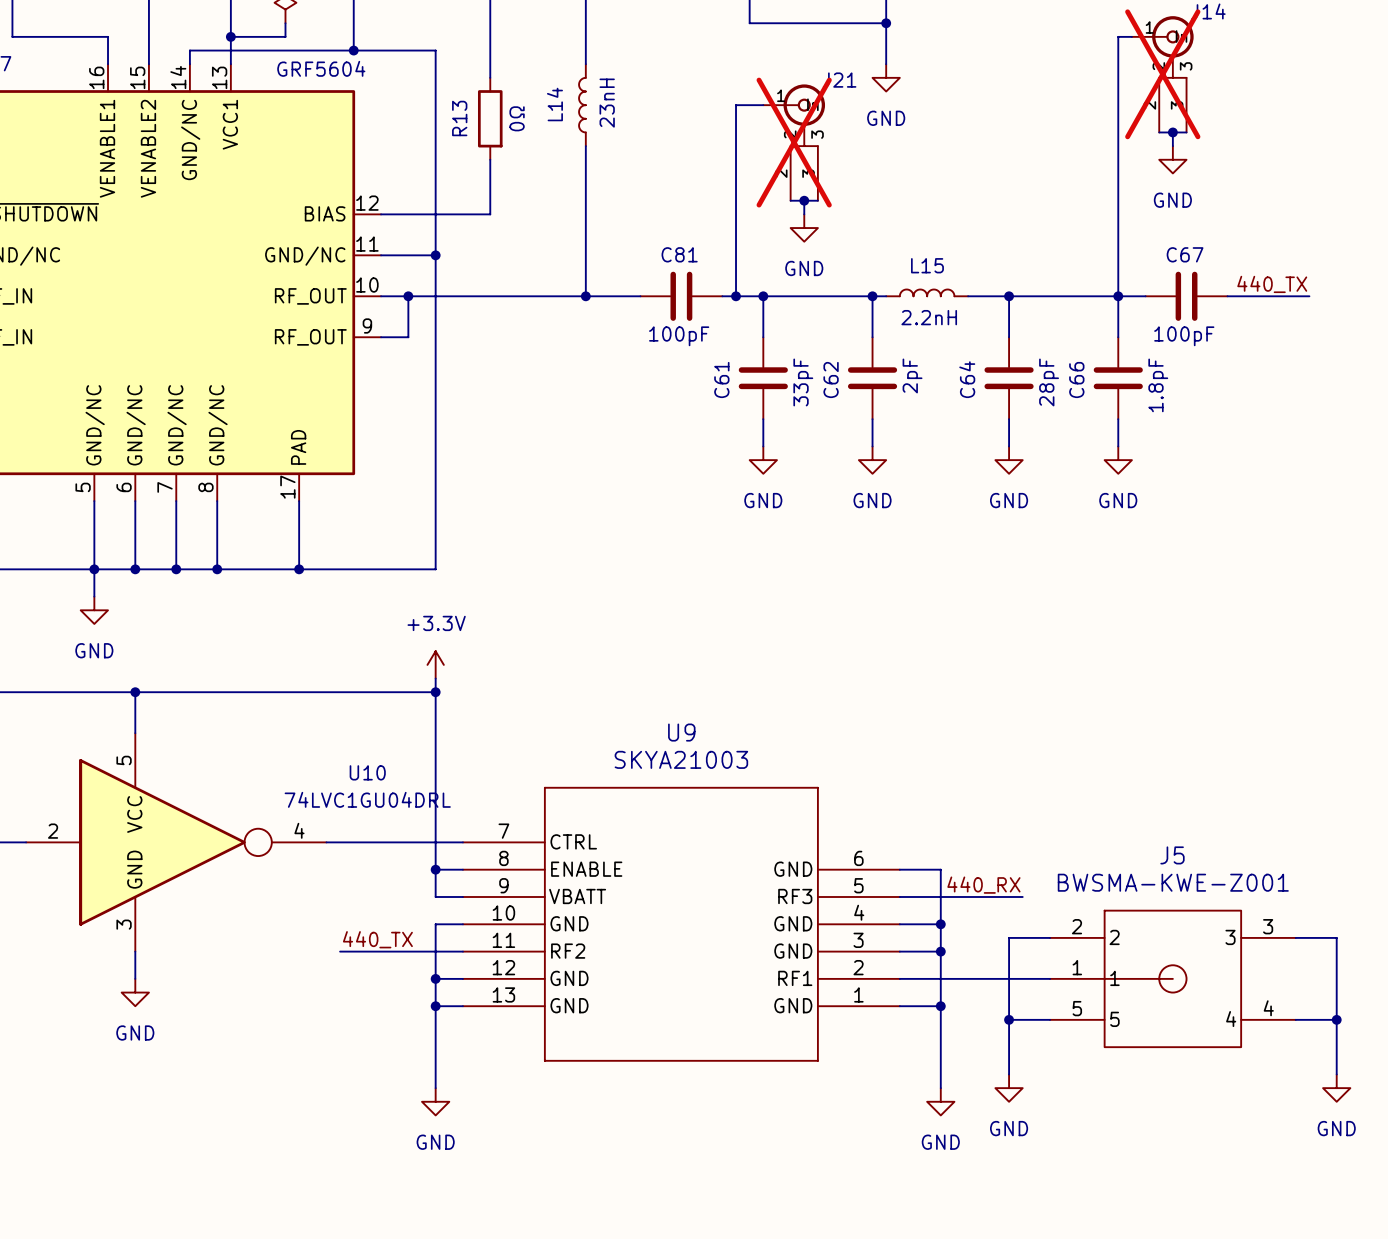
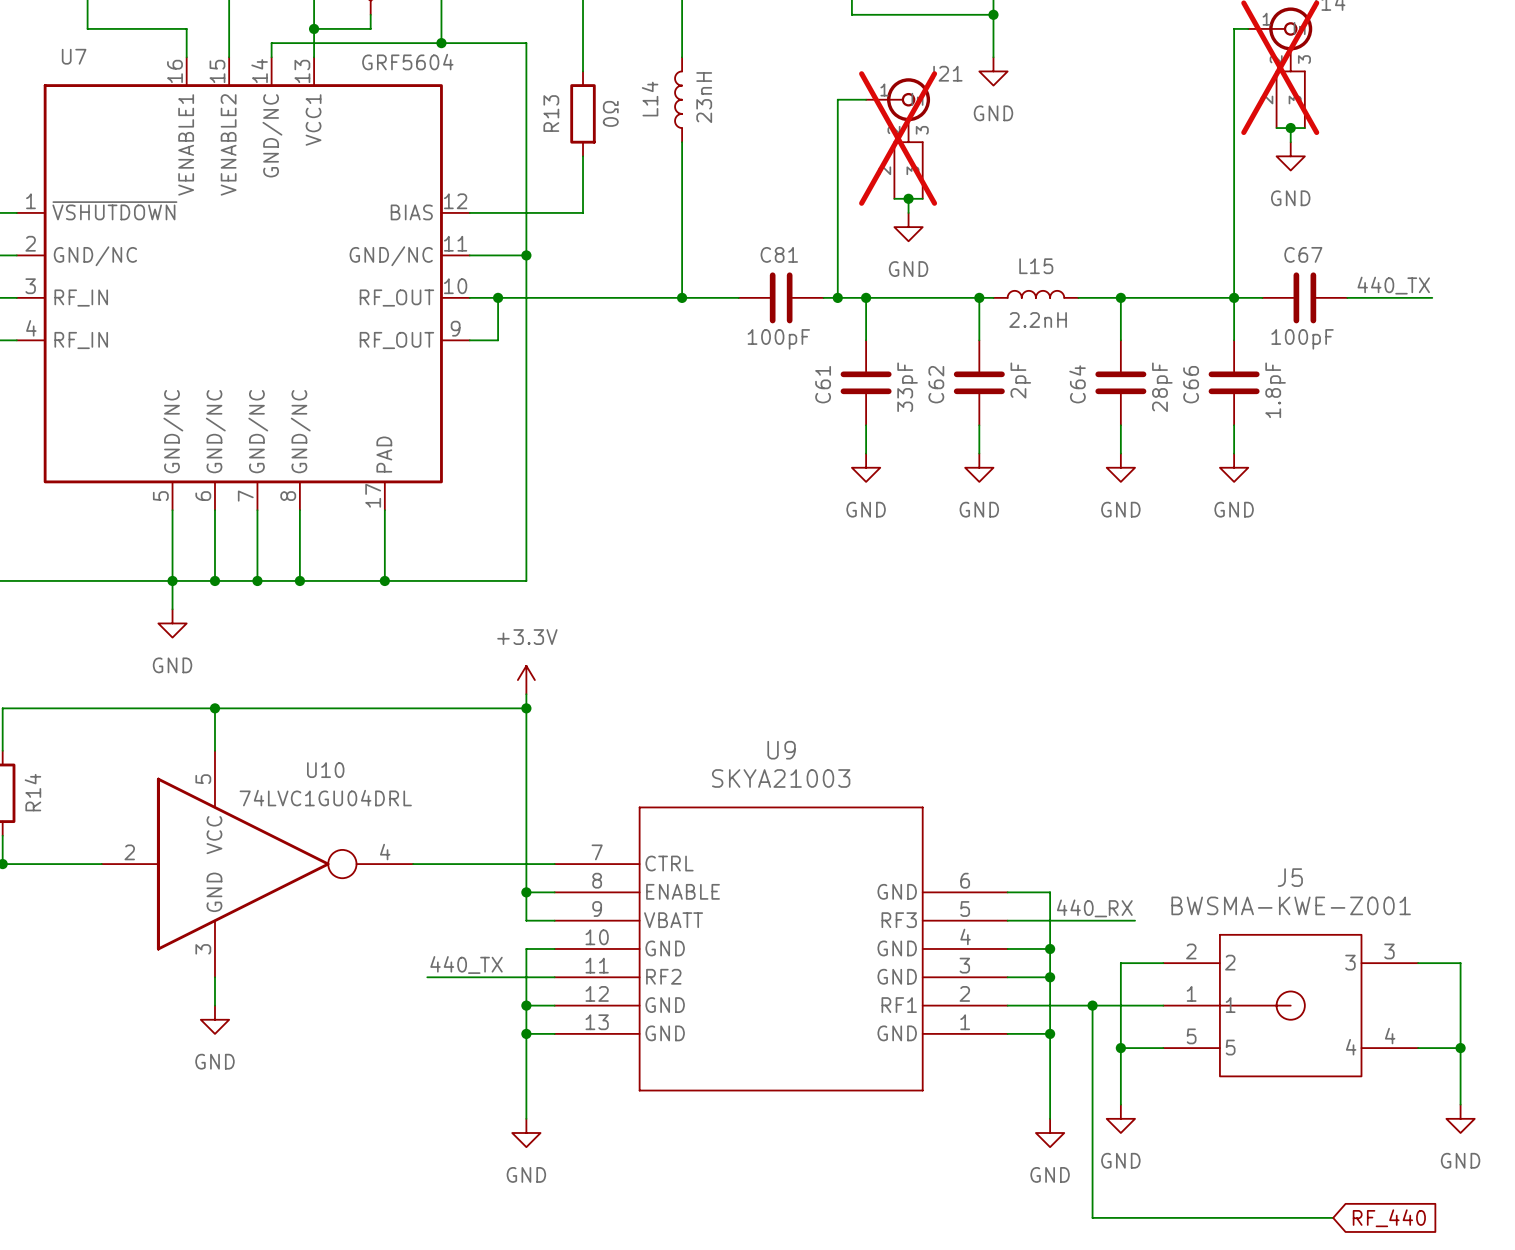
U10 name position: U10 (367, 772) -> U10 (325, 770)
U10 value position: 74LVC1GU04DRL (367, 799) -> 74LVC1GU04DRL (325, 798)
wire: none -> (1092, 1005) (1092, 1217) (1333, 1217)
junction: none -> (1092, 1005)
global label: none -> RF_440 (1389, 1218)

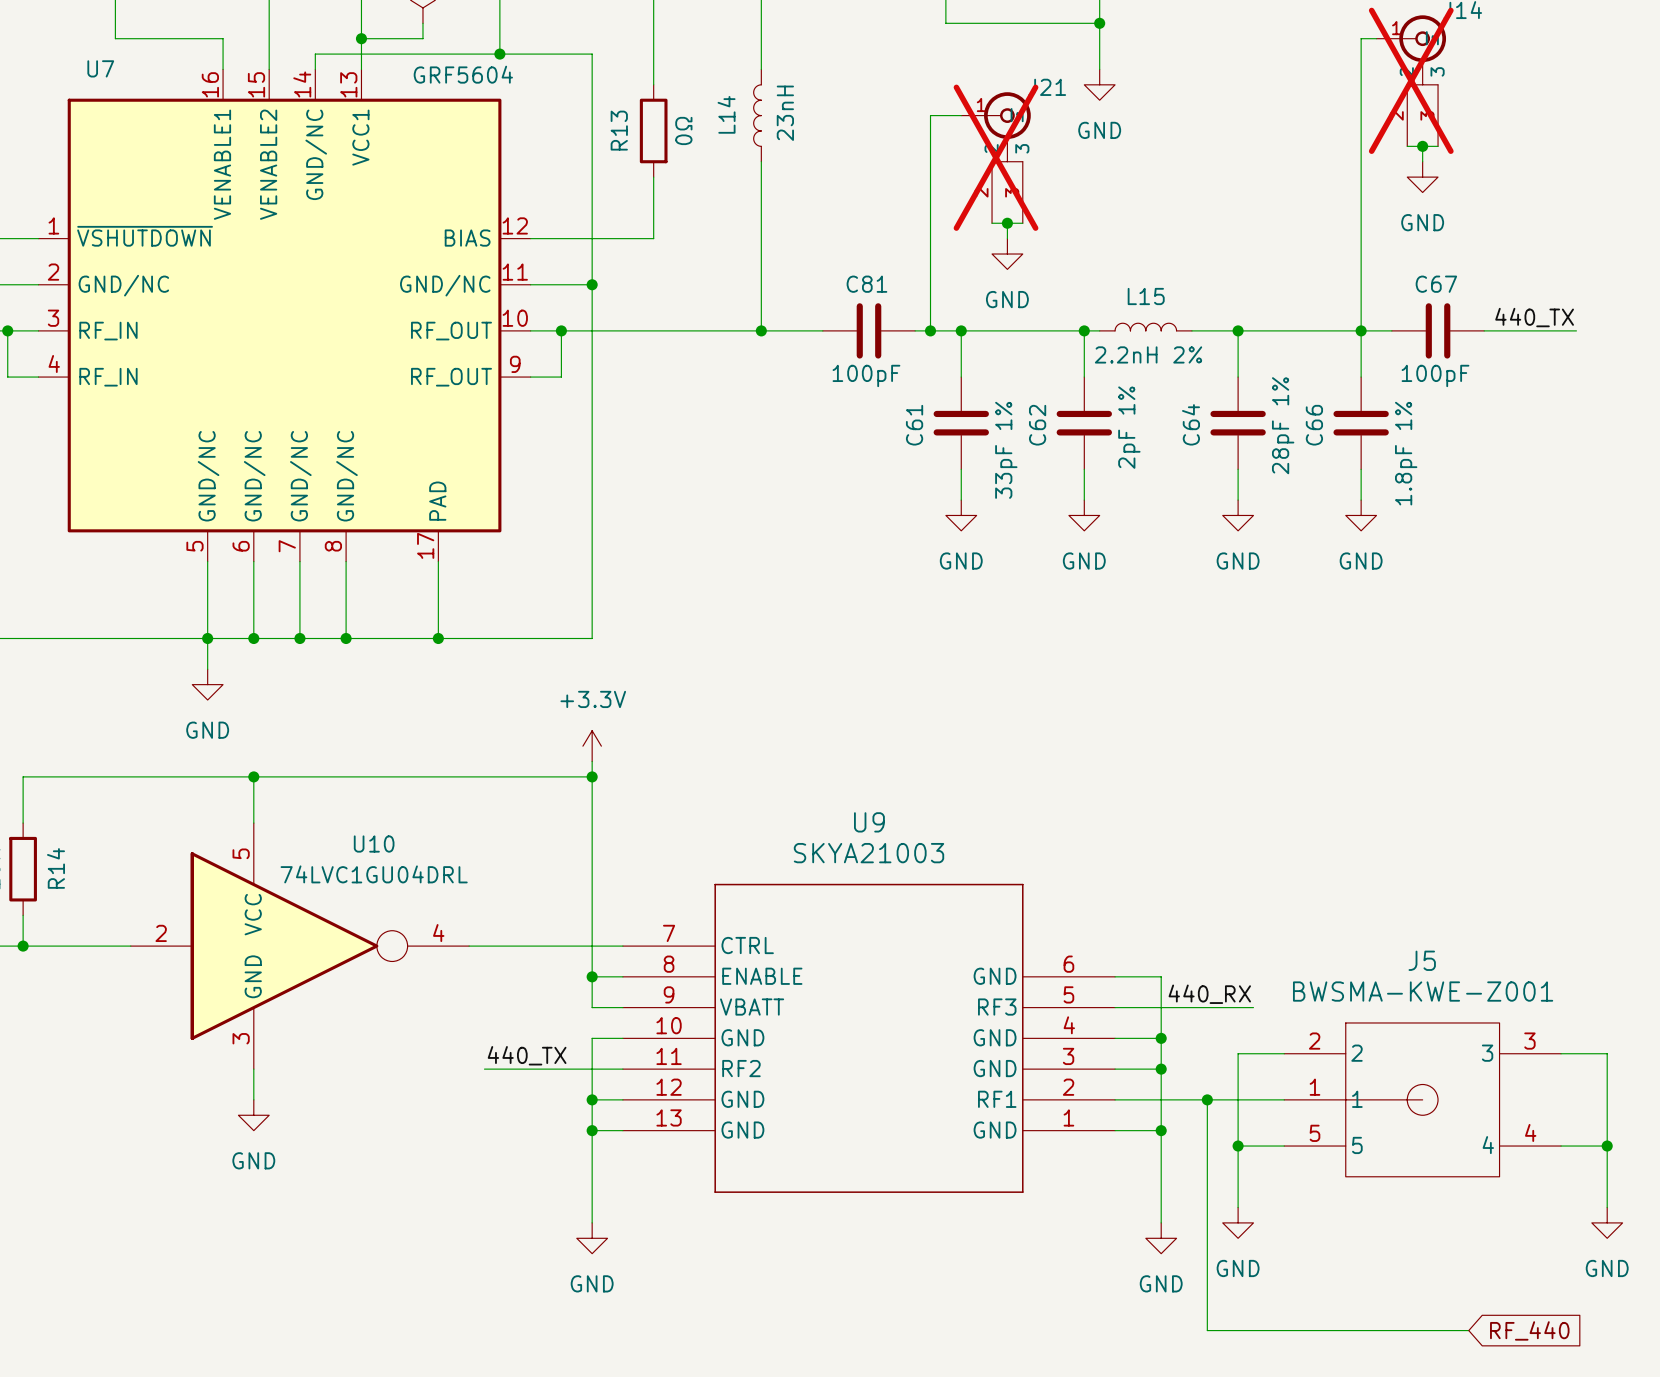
L15 value: 2.2nH (1038, 320) -> 2.2nH 2% (1148, 354)
C62 value: 2pF (1020, 380) -> 2pF 1% (1129, 427)
C61 value: 33pF (907, 387) -> 33pF 1% (1006, 450)
C64 value: 28pF (1162, 387) -> 28pF 1% (1283, 425)
C66 value: 1.8pF (1275, 390) -> 1.8pF 1% (1406, 453)

